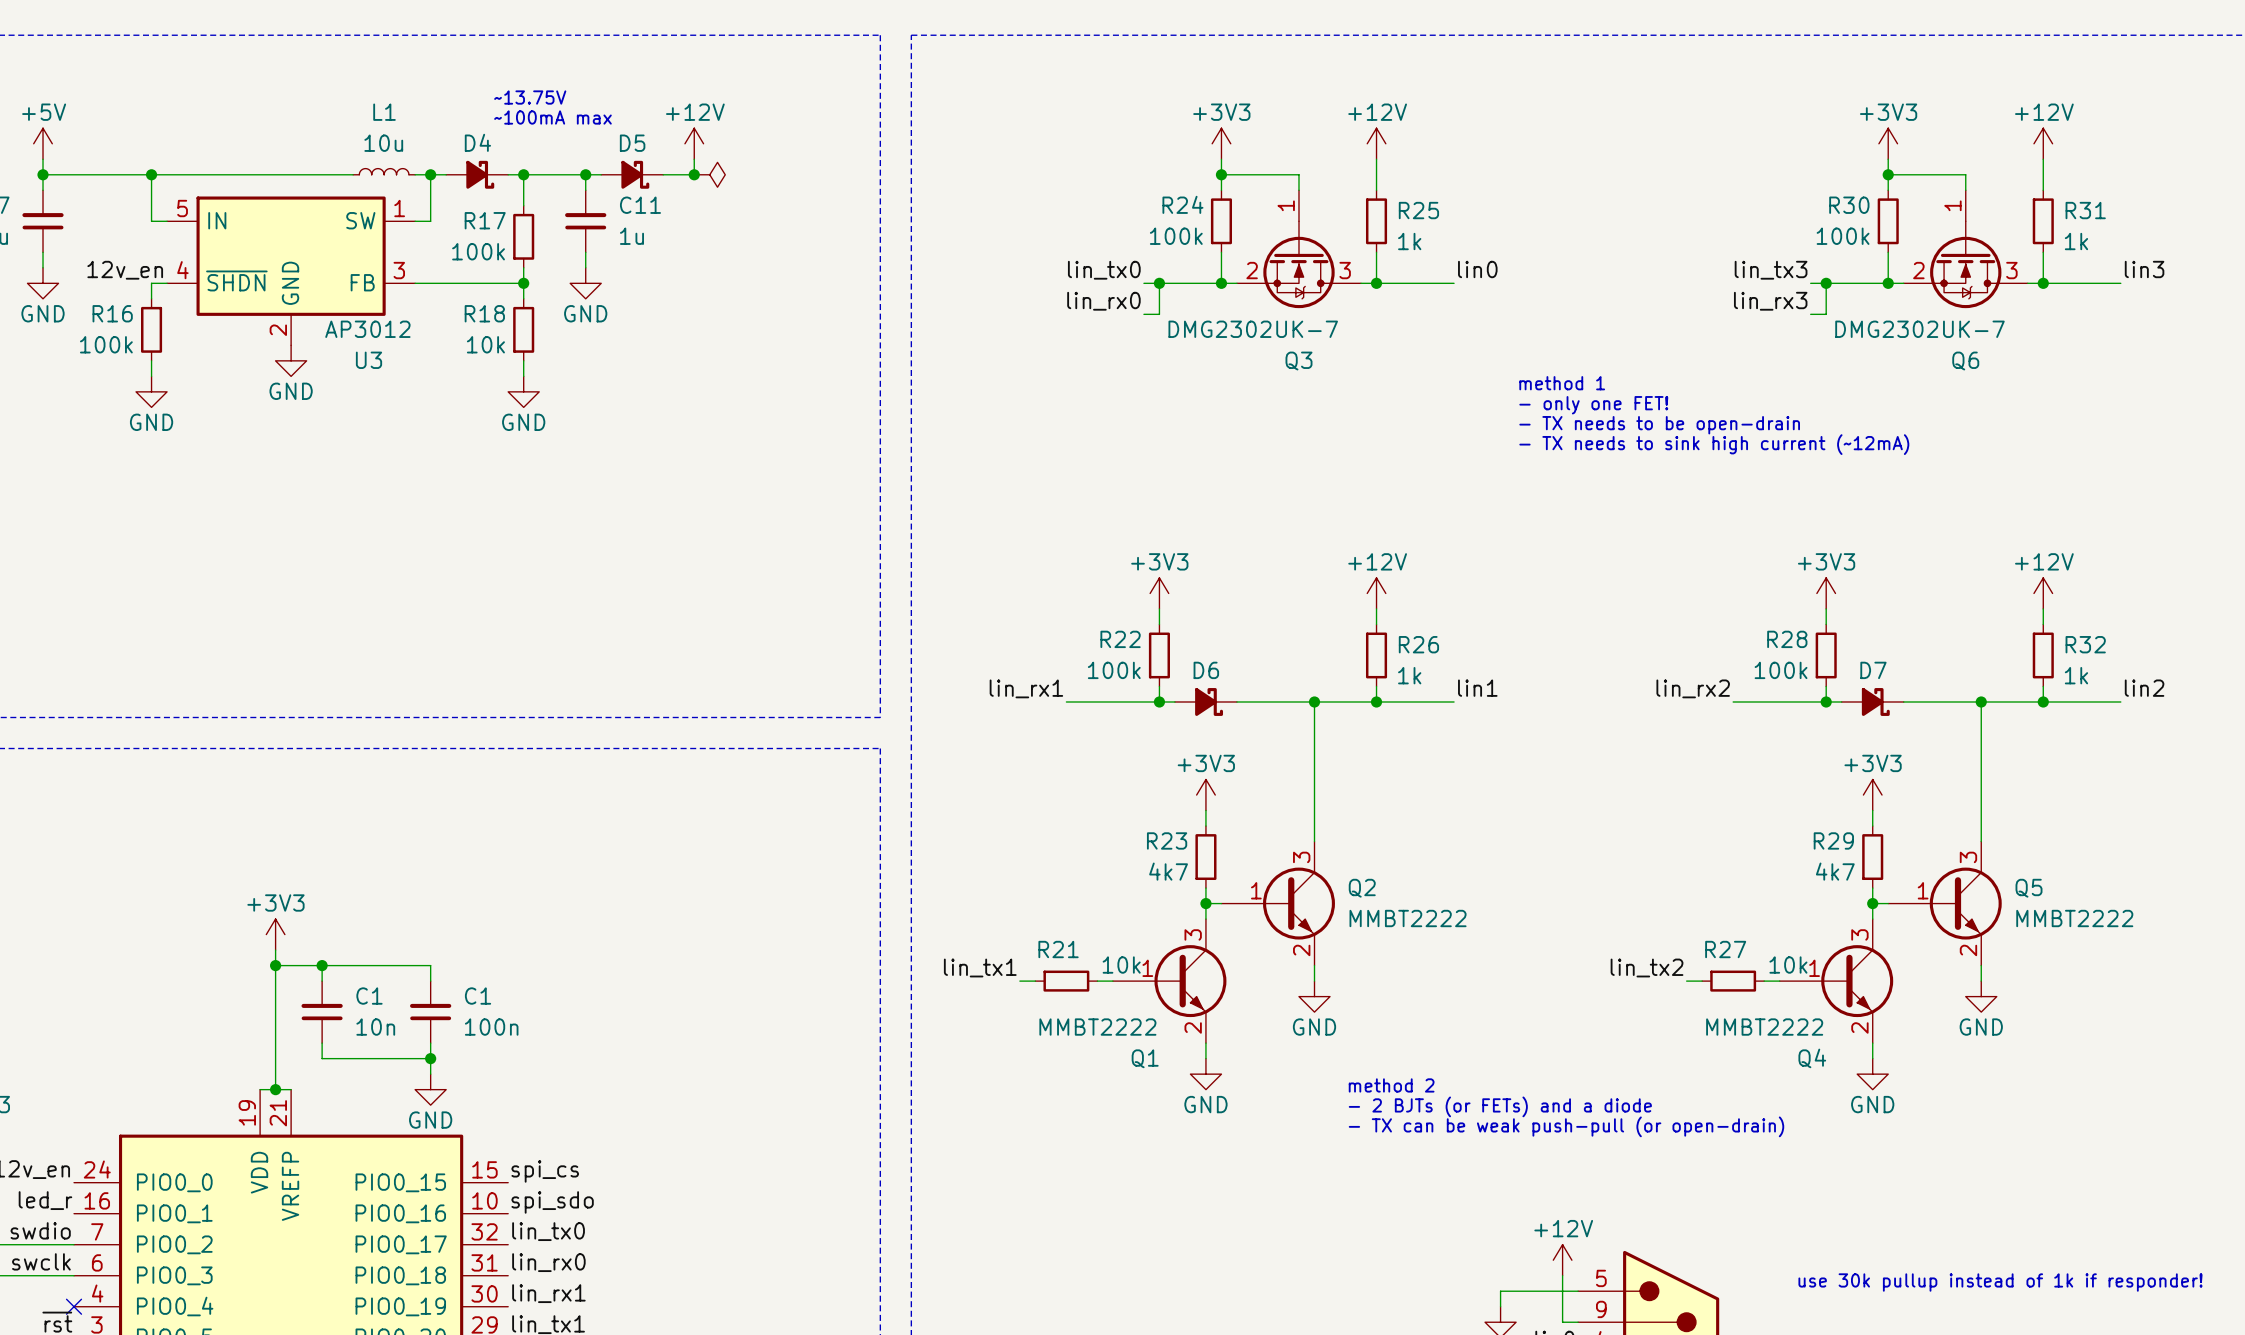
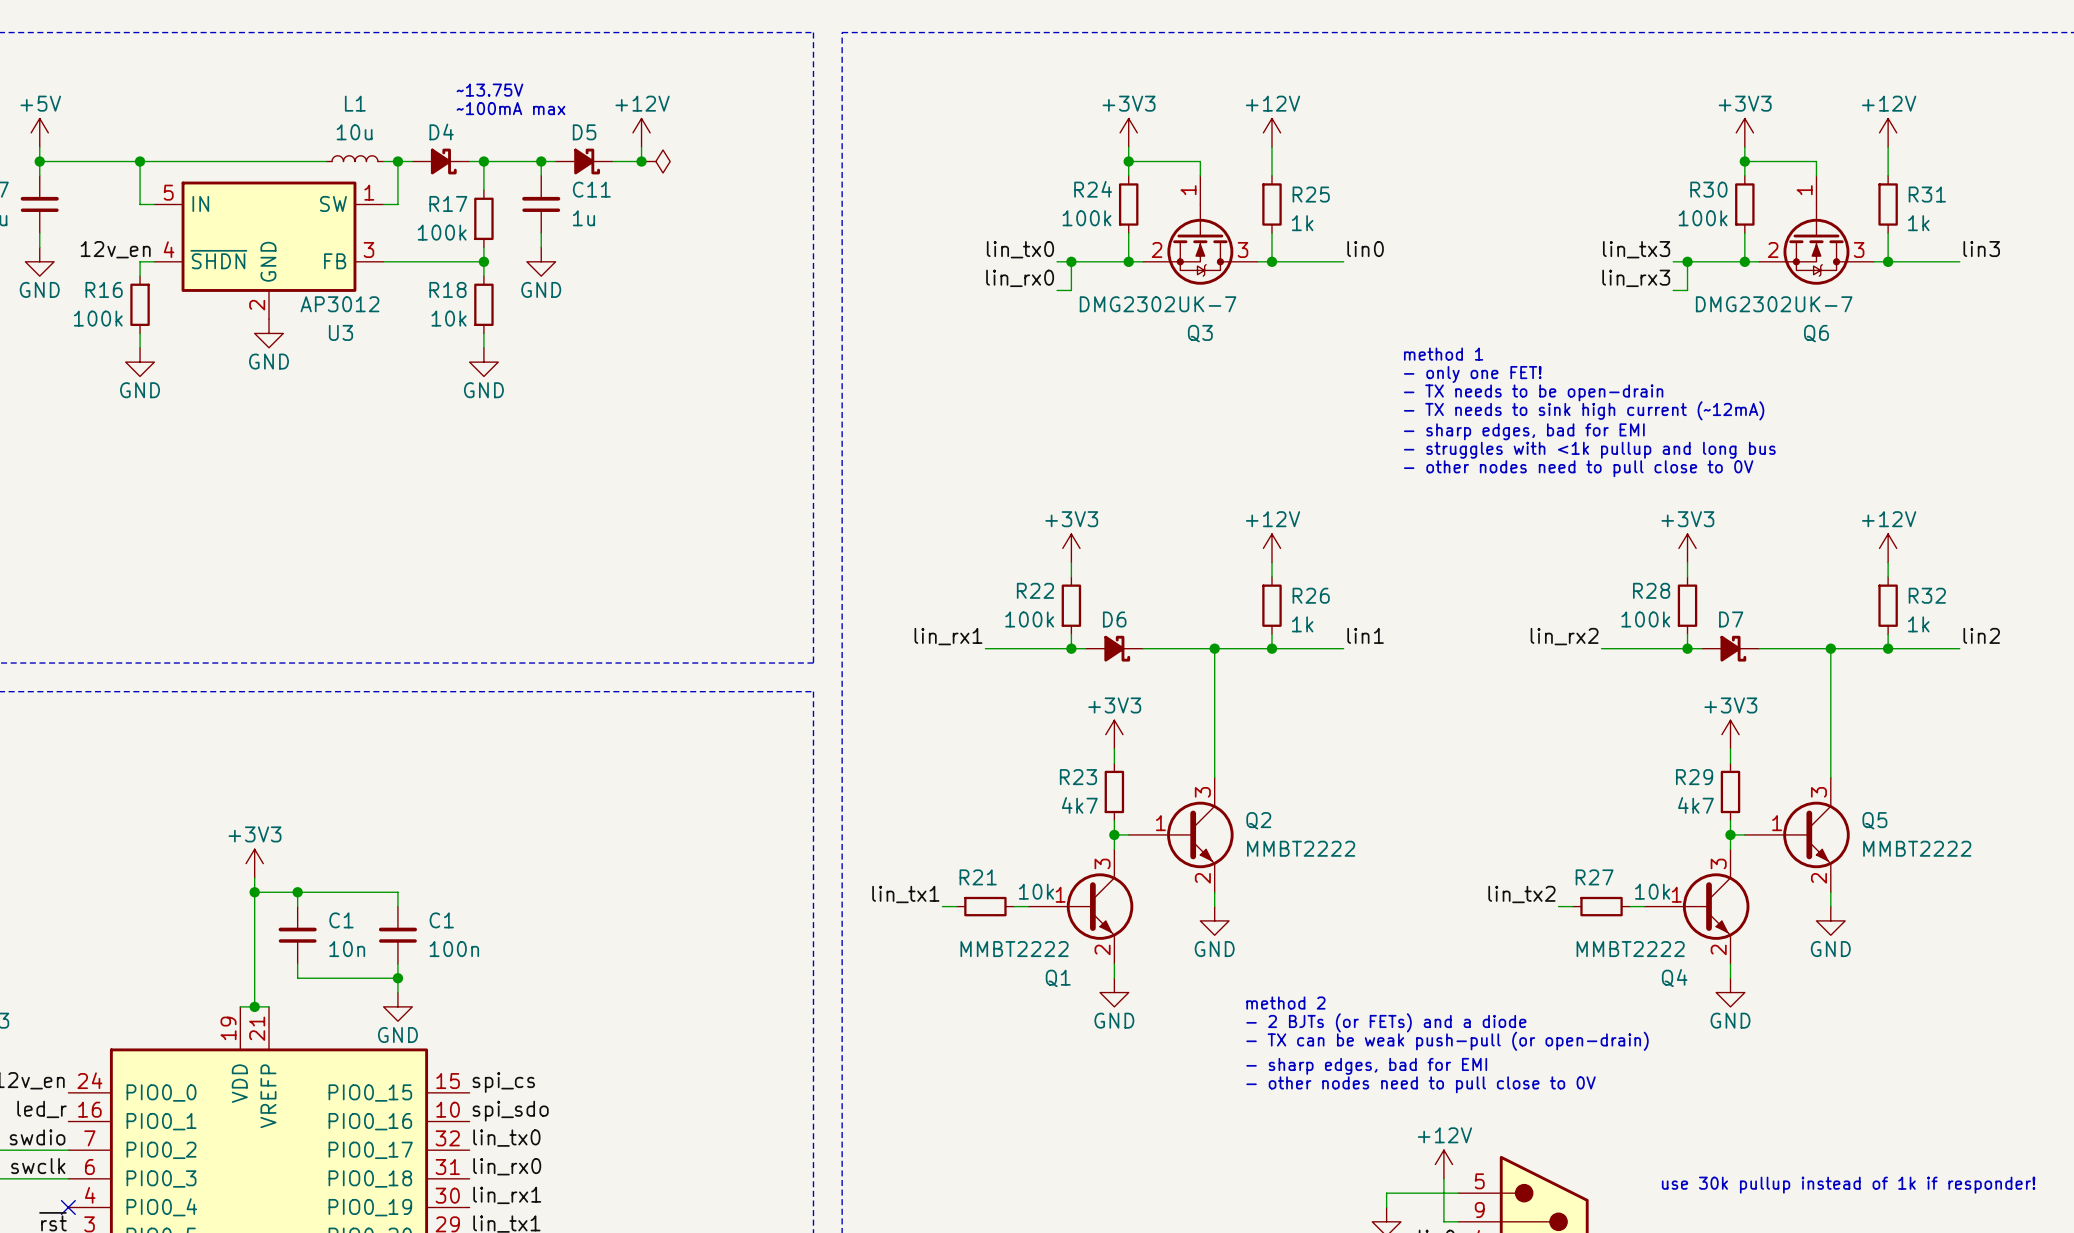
text: none -> - sharp edges, bad for EMI (1524, 431)
text: none -> - struggles with <1k pullup and long bus (1589, 450)
text: none -> - other nodes need to pull close to 0V (1578, 468)
text: none -> - sharp edges, bad for EMI (1366, 1066)
text: none -> - other nodes need to pull close to 0V (1421, 1084)

